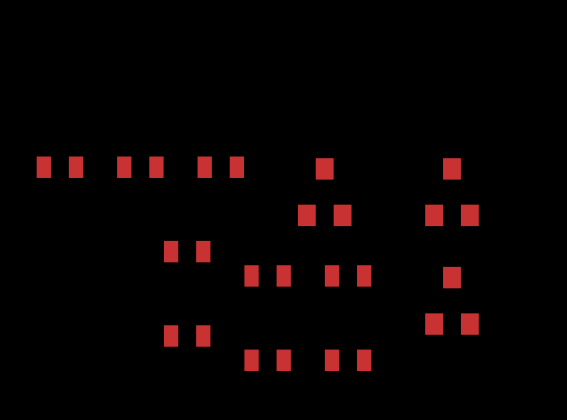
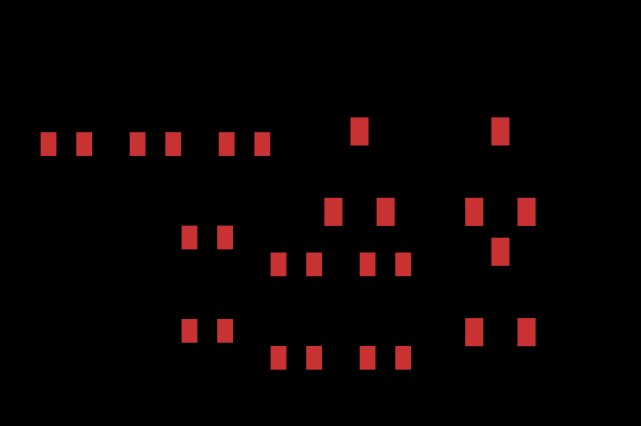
part footprint: [297, 158, 352, 227] -> [324, 117, 395, 226]
part footprint: [425, 158, 479, 227] -> [465, 117, 536, 226]
part footprint: [425, 266, 479, 335] -> [465, 237, 536, 347]

